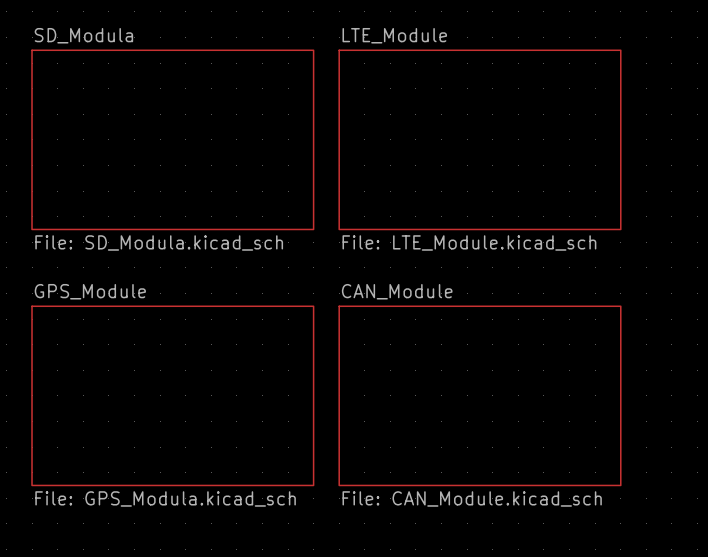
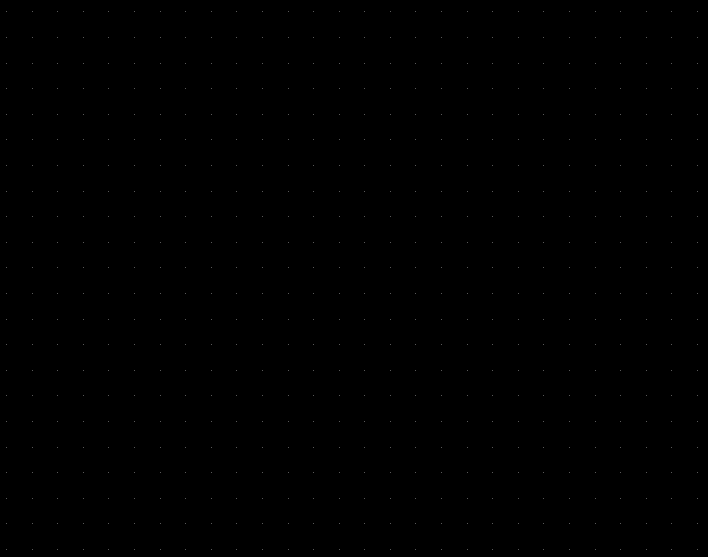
sheet SD_Modula: File: SD_Modula.kicad_sch (172, 139) -> none
sheet LTE_Module: File: LTE_Module.kicad_sch (479, 139) -> none
sheet GPS_Module: File: GPS_Modula.kicad_sch (172, 395) -> none
sheet CAN_Module: File: CAN_Module.kicad_sch (479, 395) -> none

